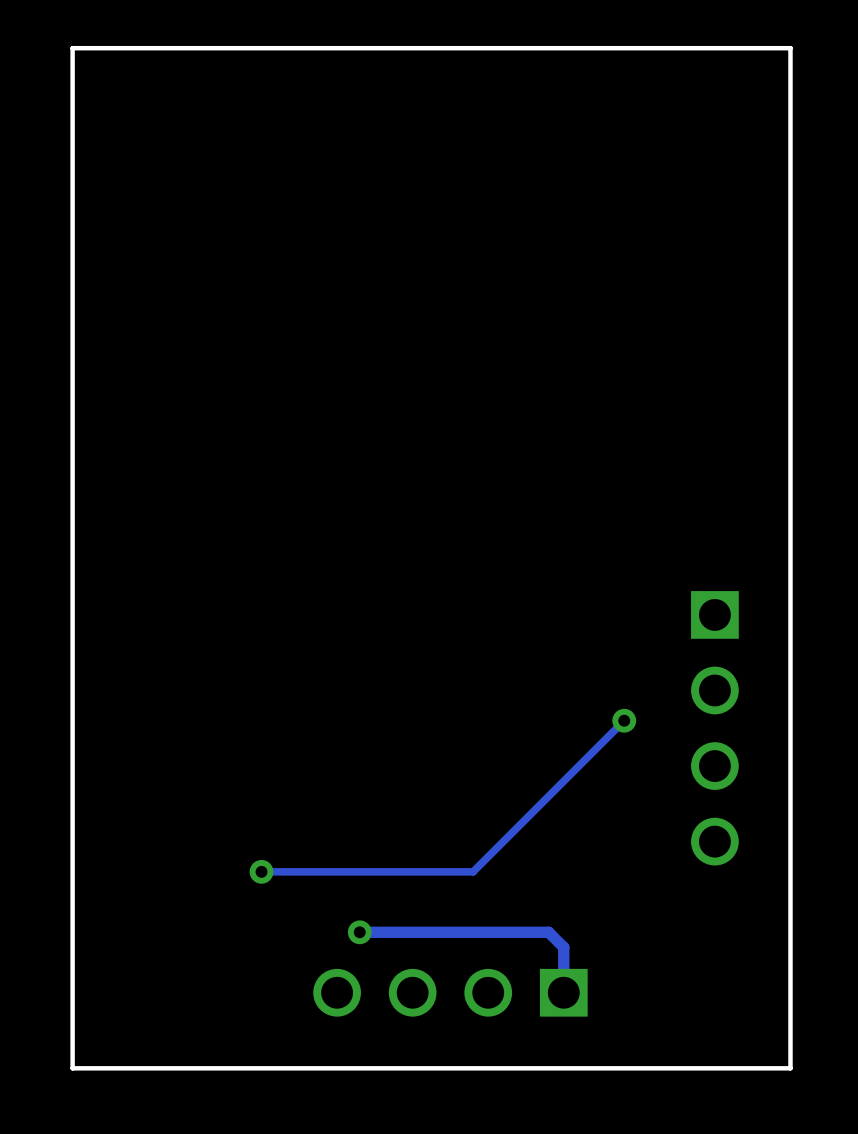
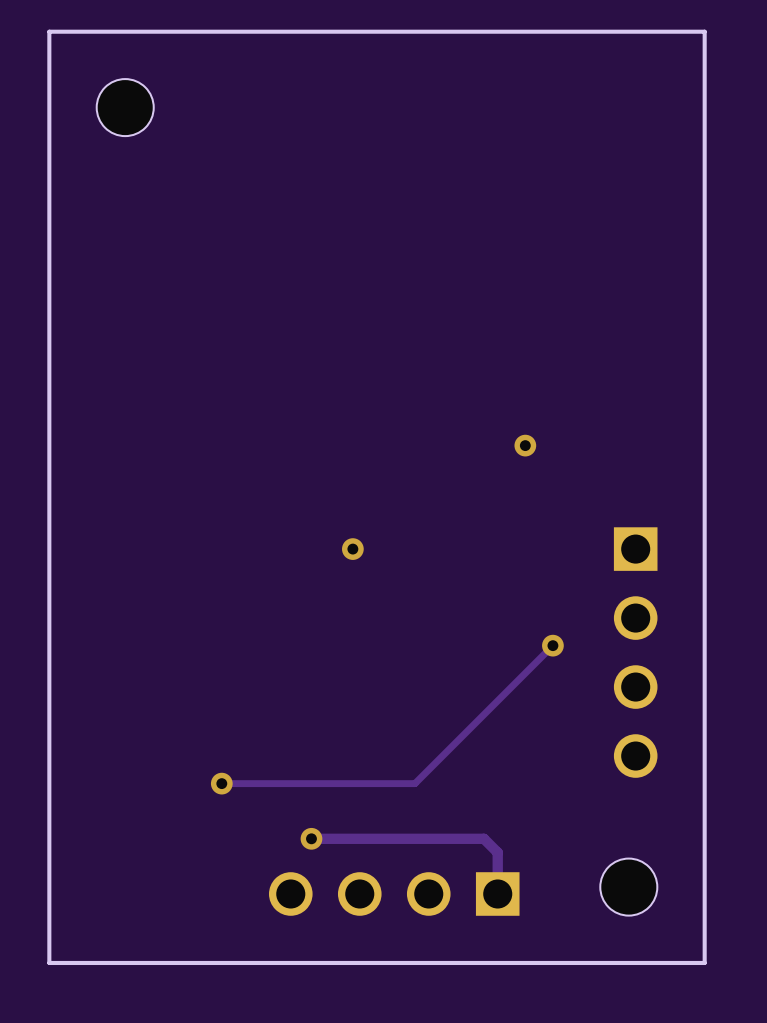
part: none -> (125, 107)
via: none -> (525, 445)
via: none -> (352, 549)
part: none -> (628, 887)

